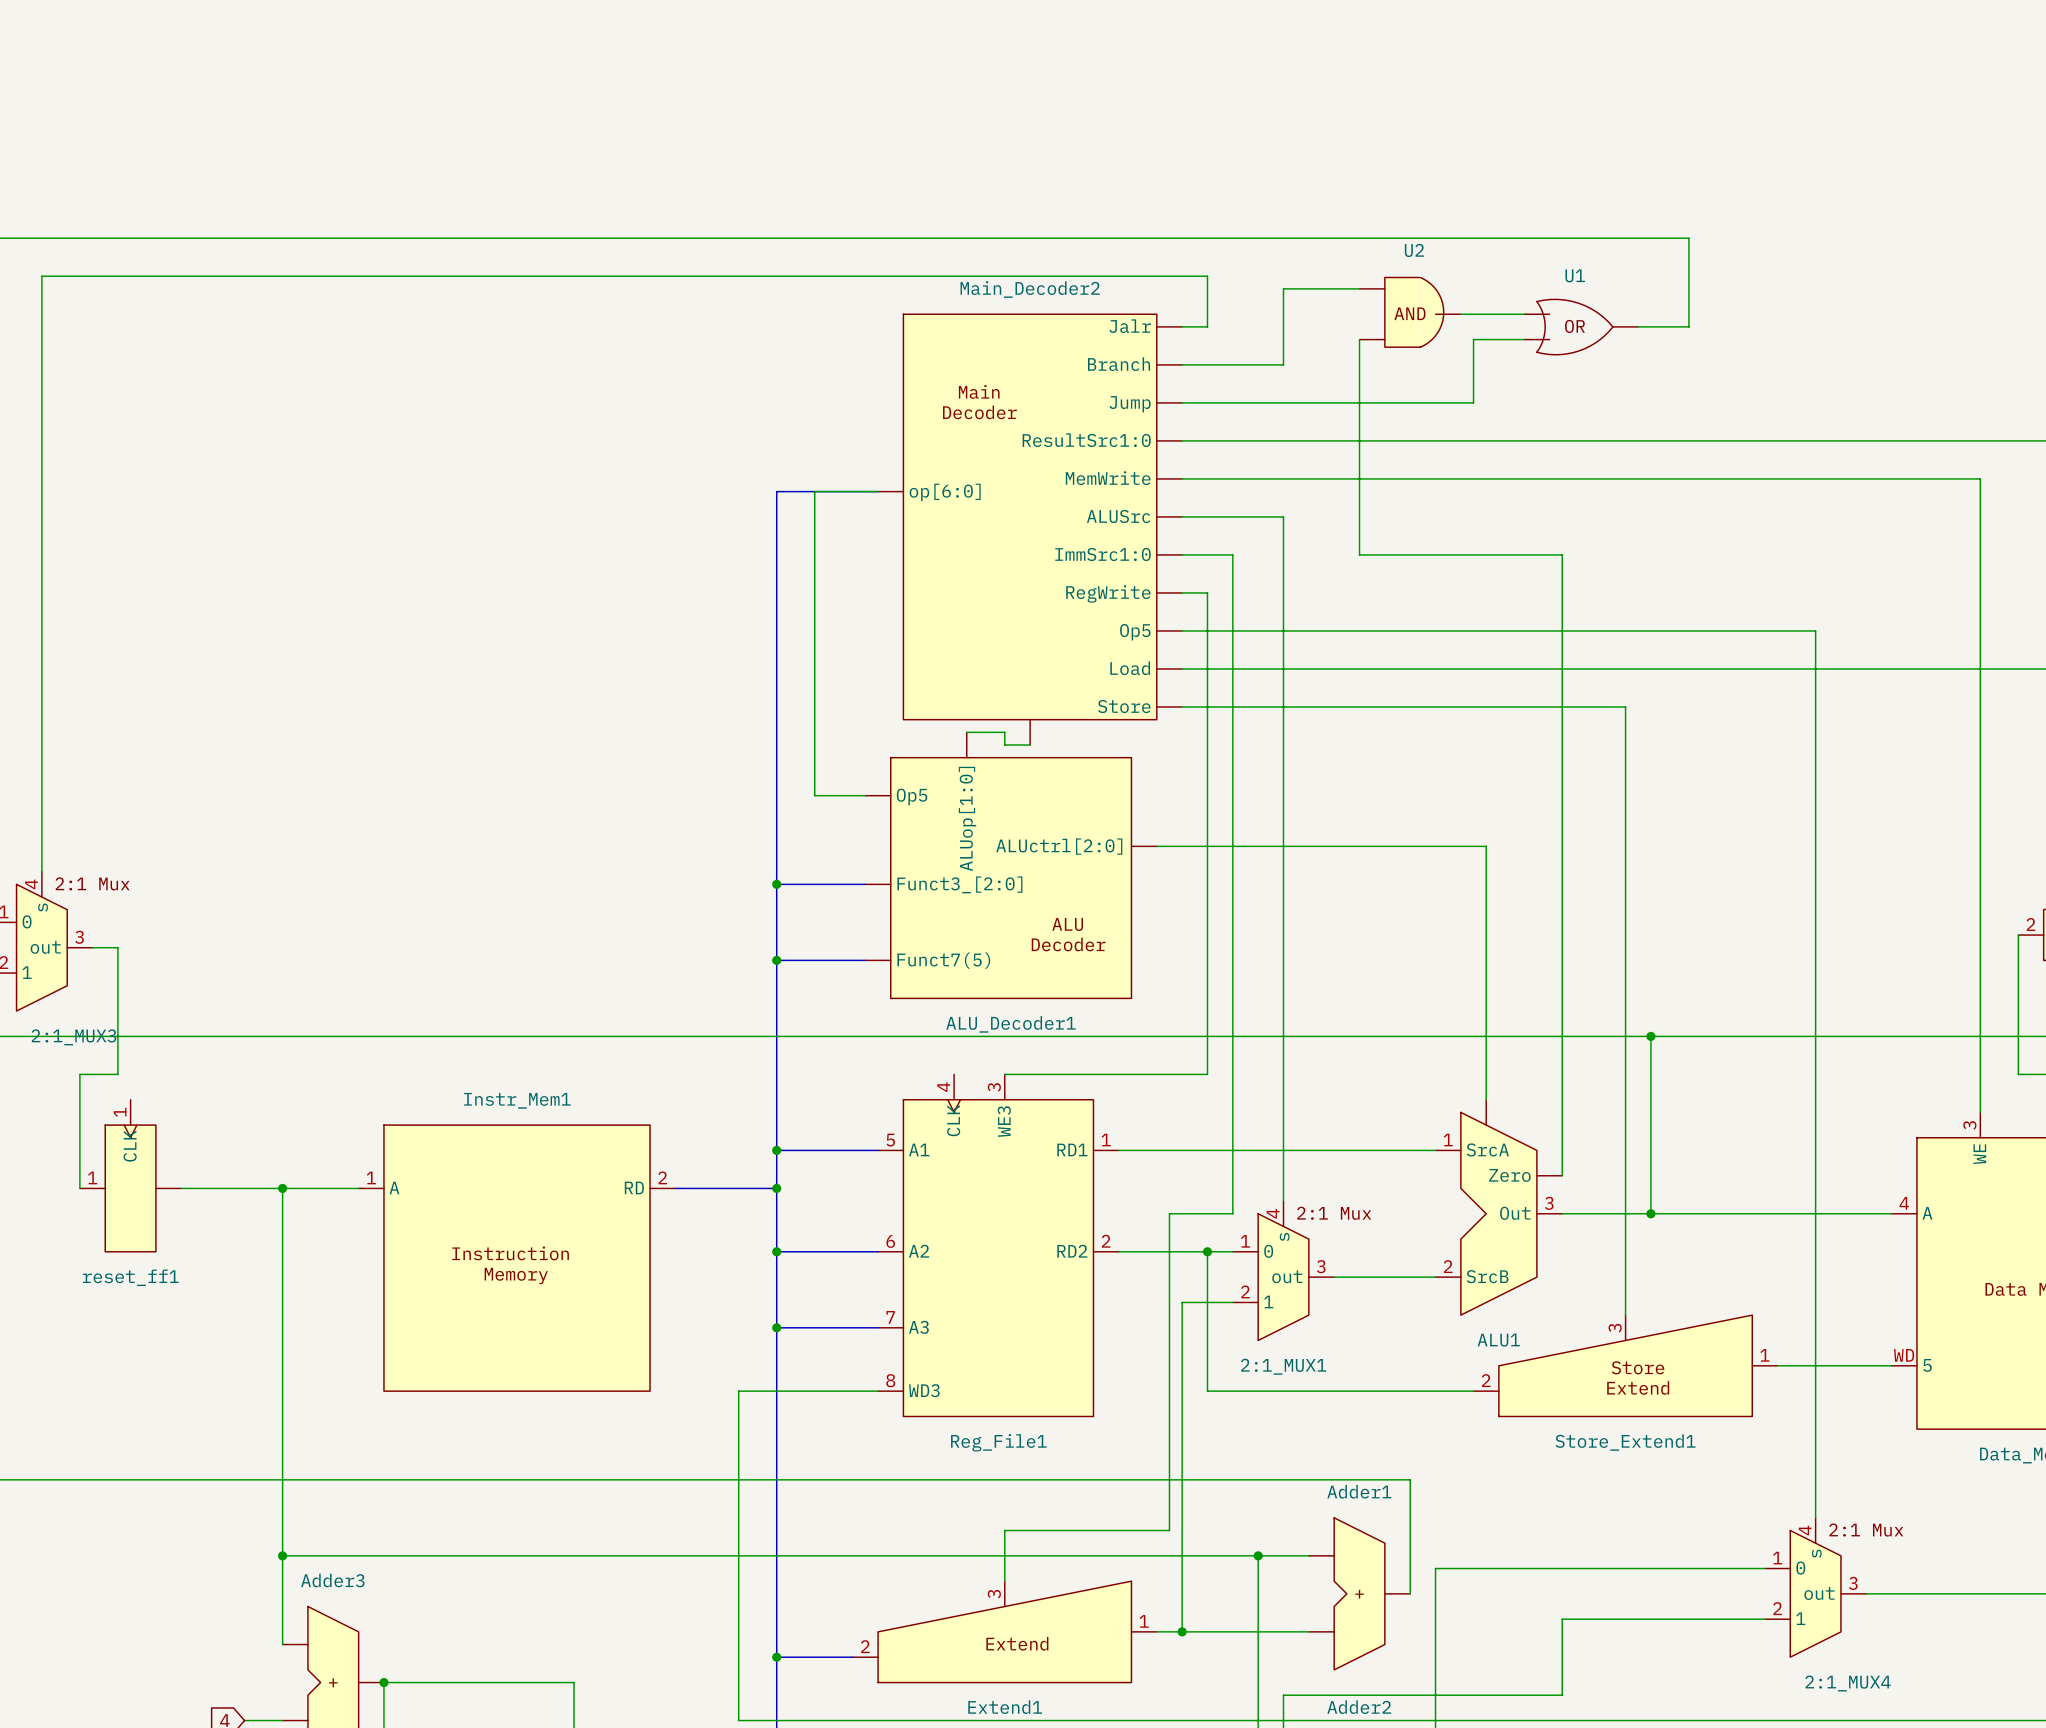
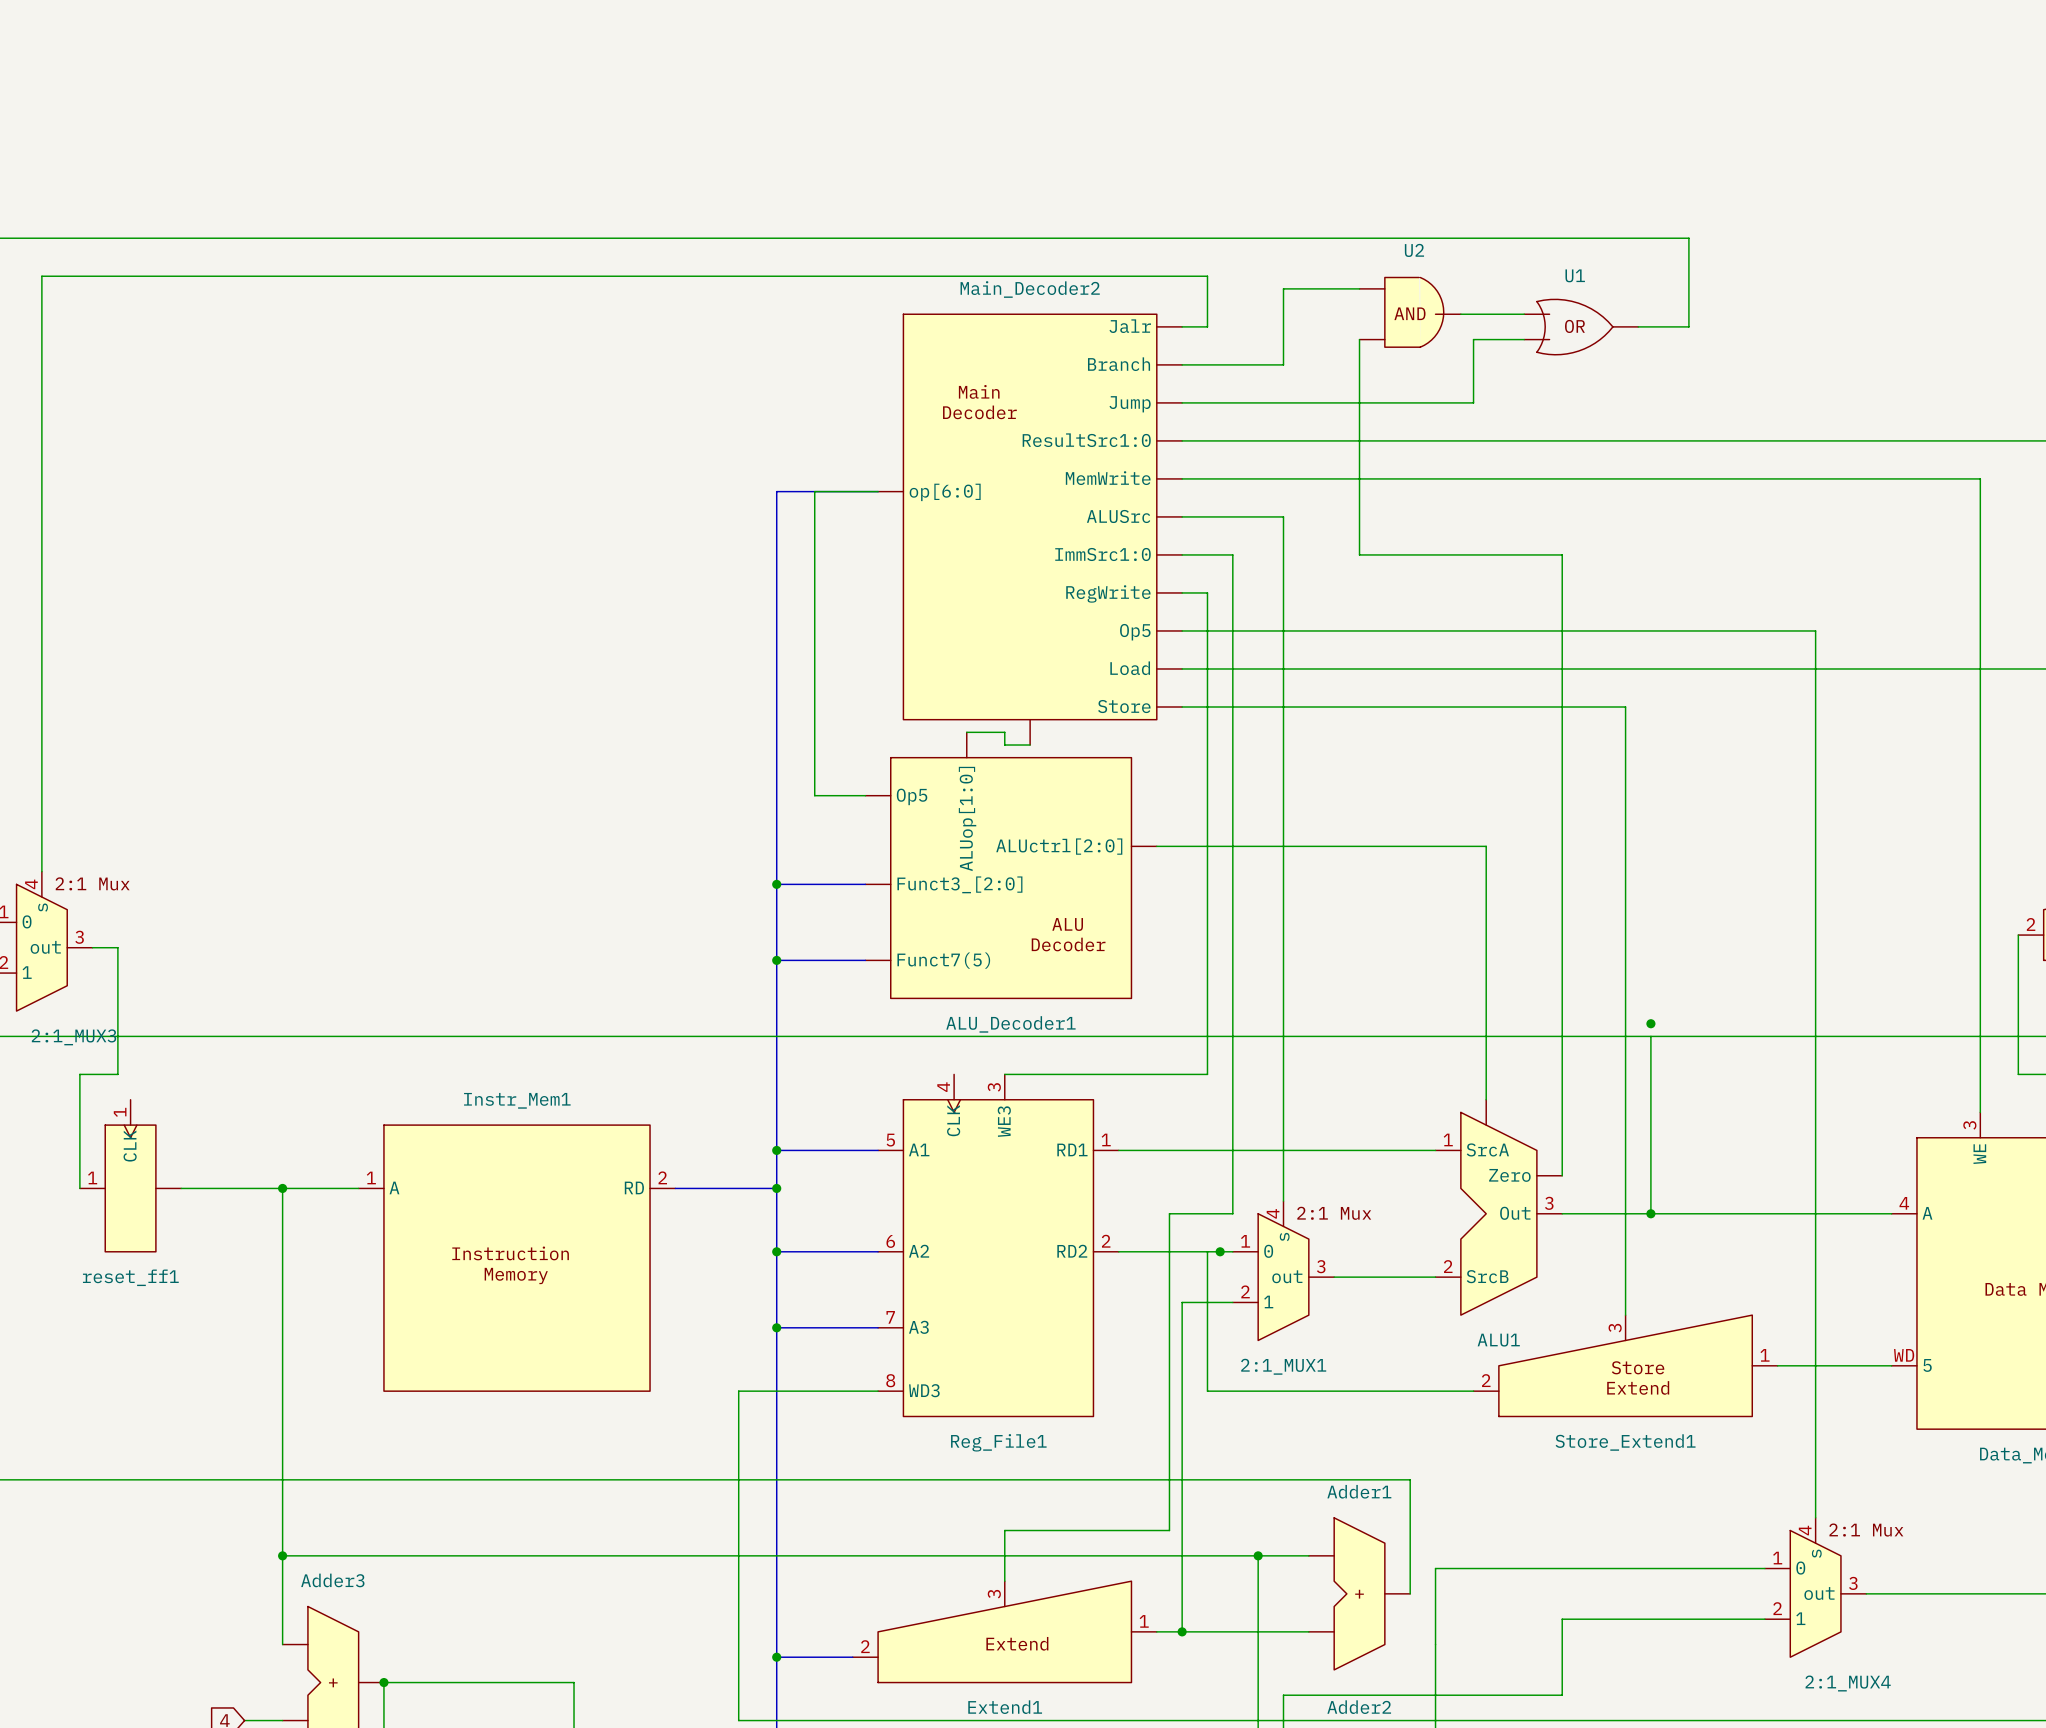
junction position: (1650, 1036) -> (1650, 1023)
junction position: (1207, 1251) -> (1220, 1251)

